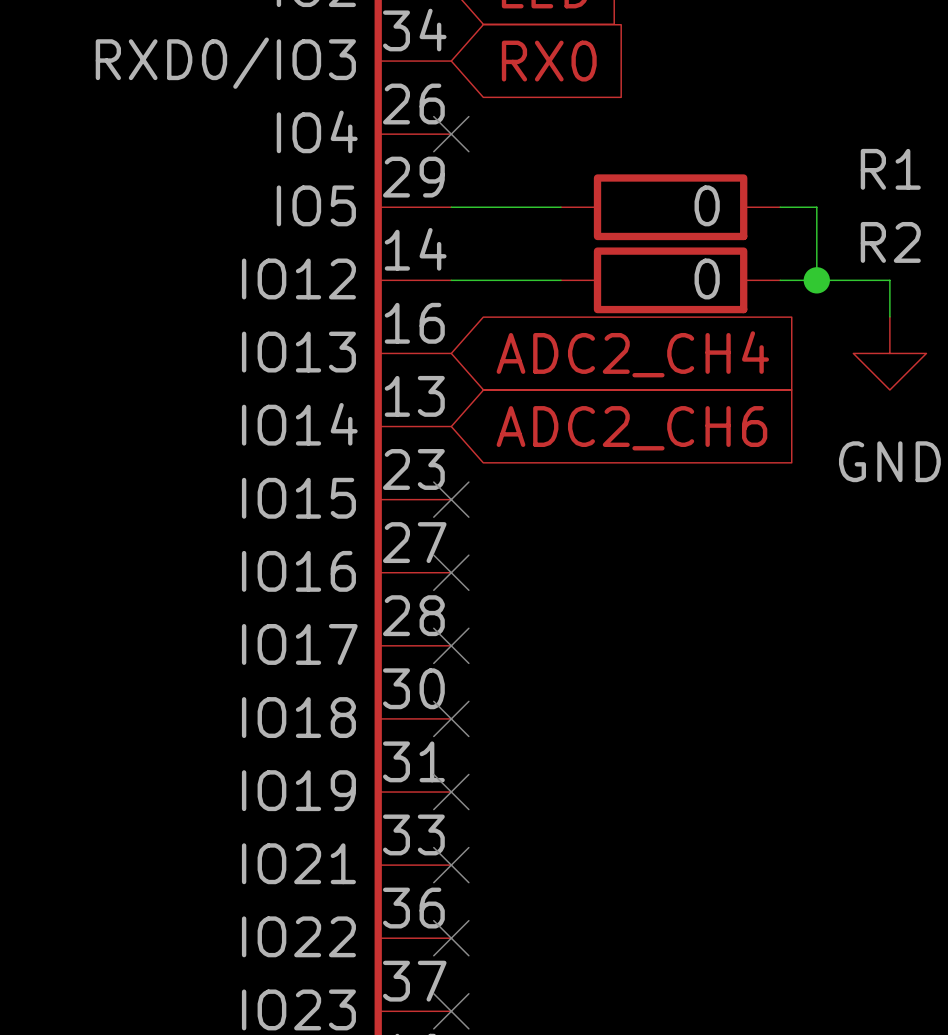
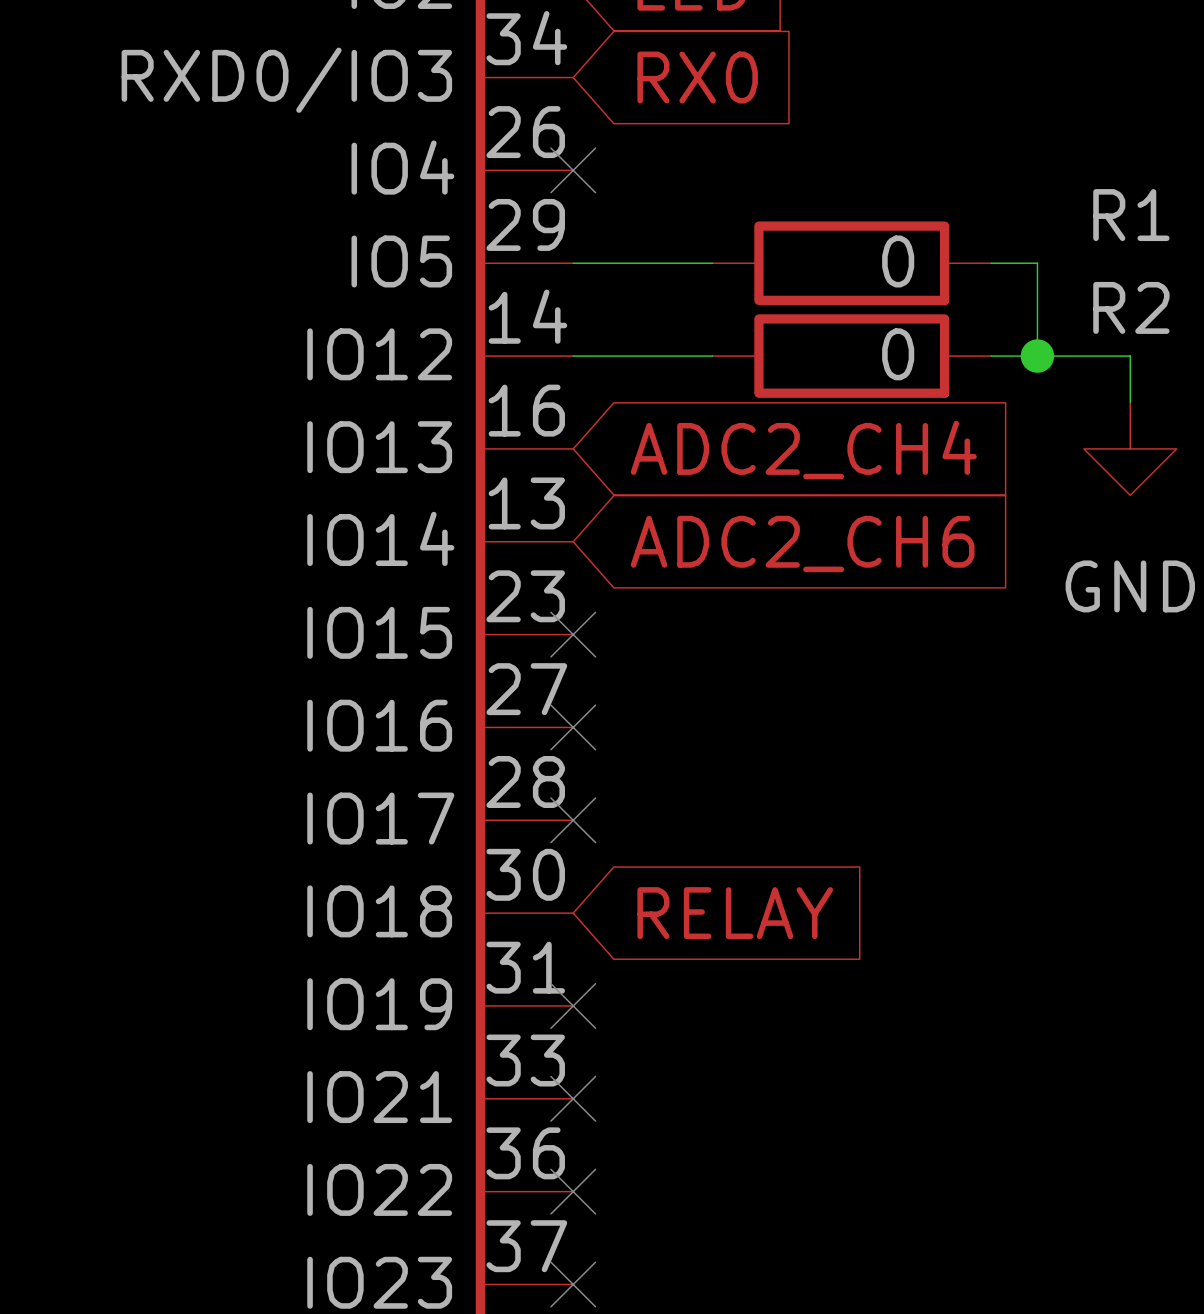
no-connect mark: (451, 718) -> none
global label: none -> RELAY (735, 913)

